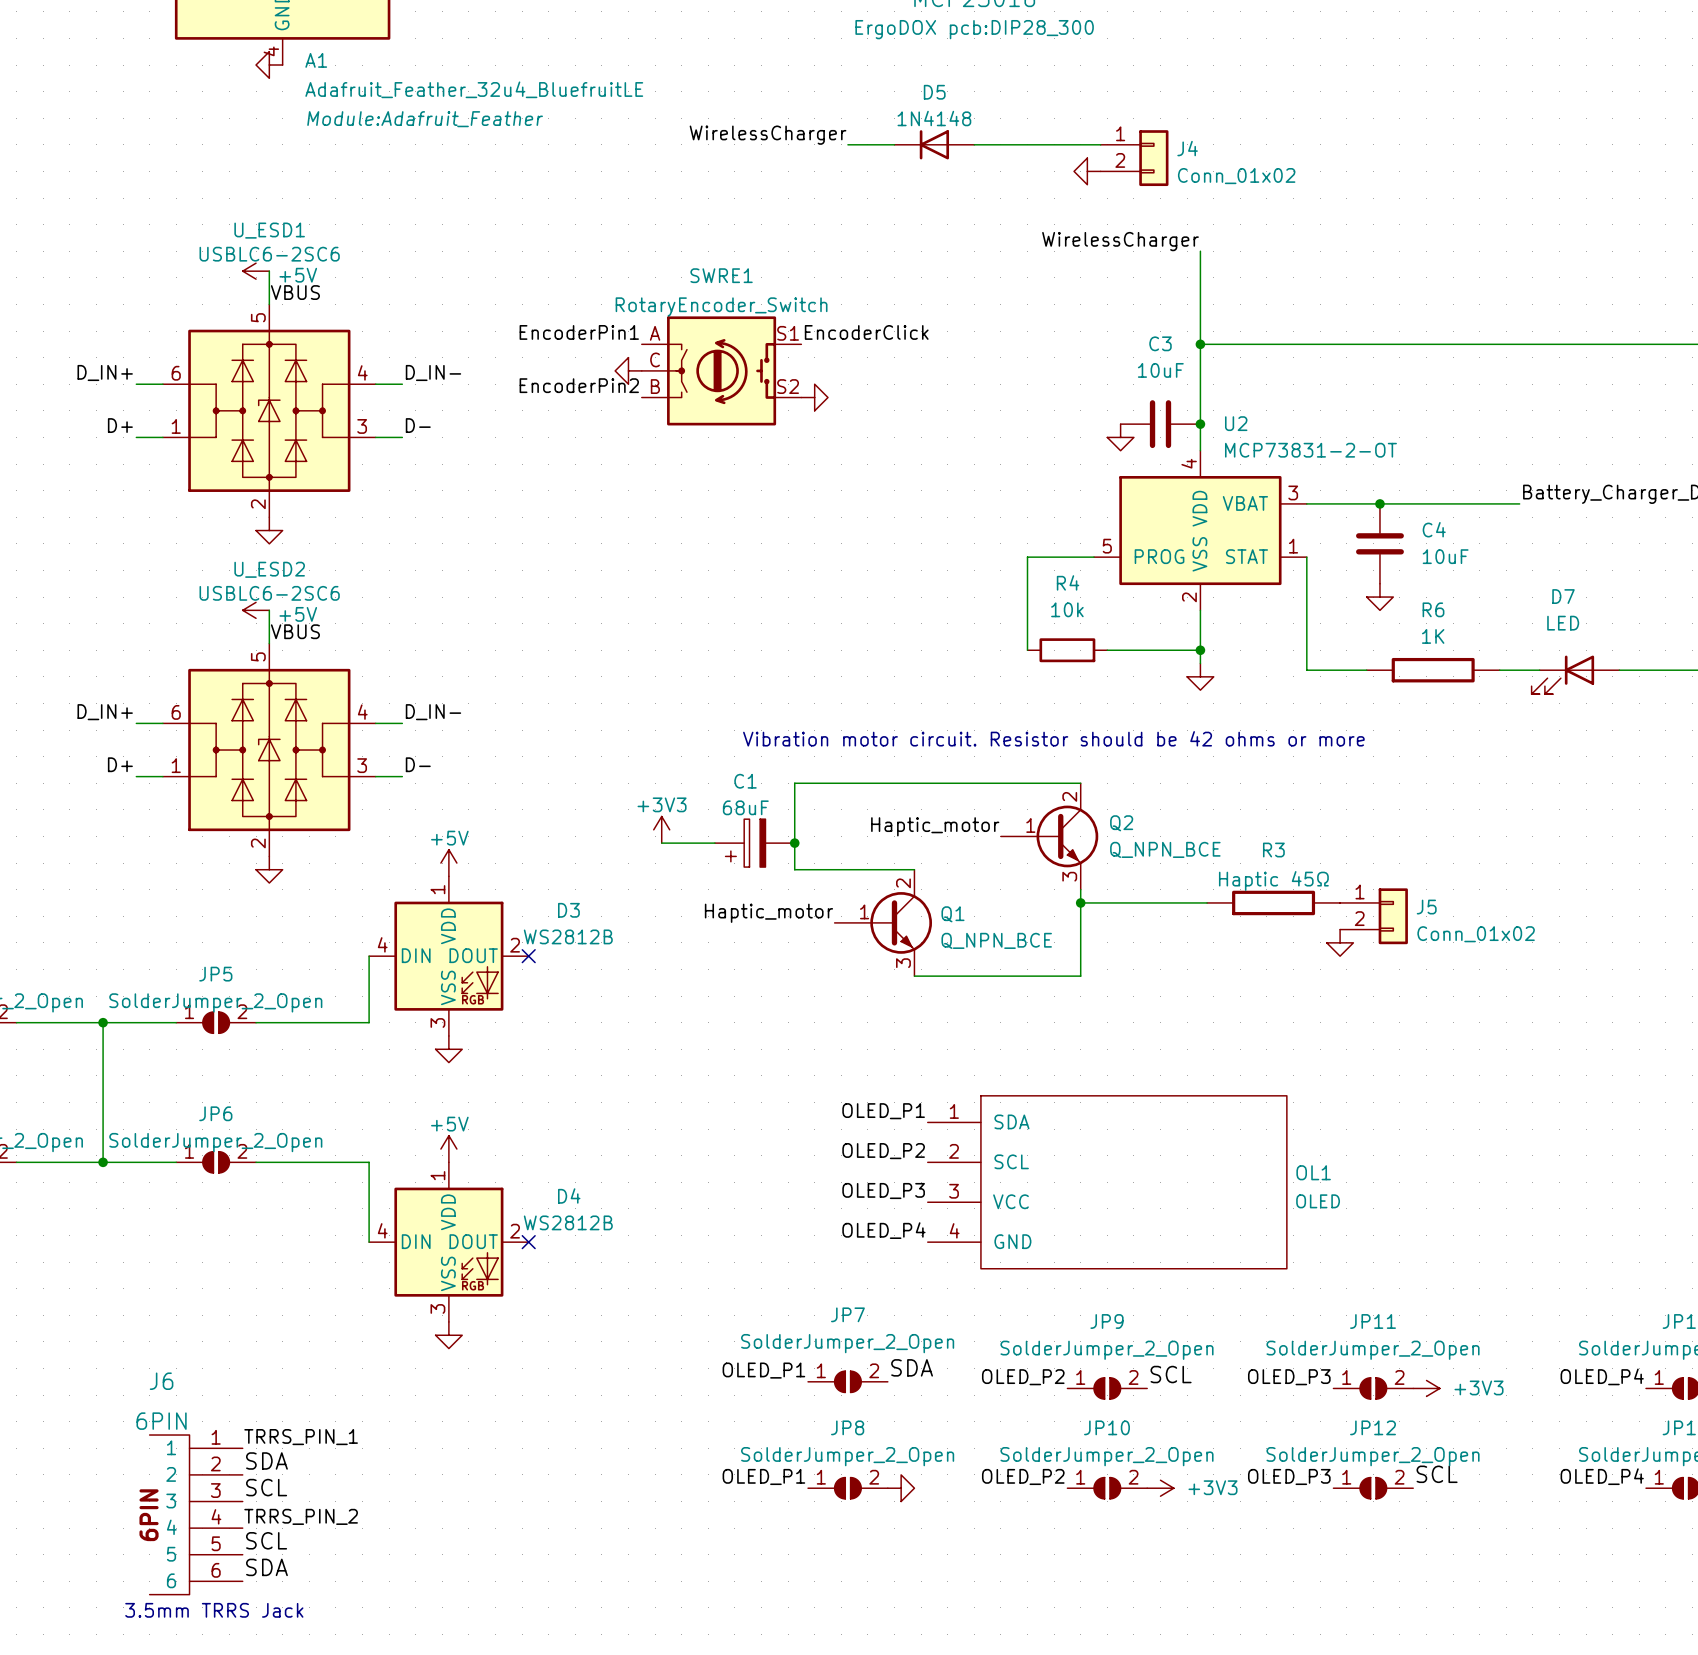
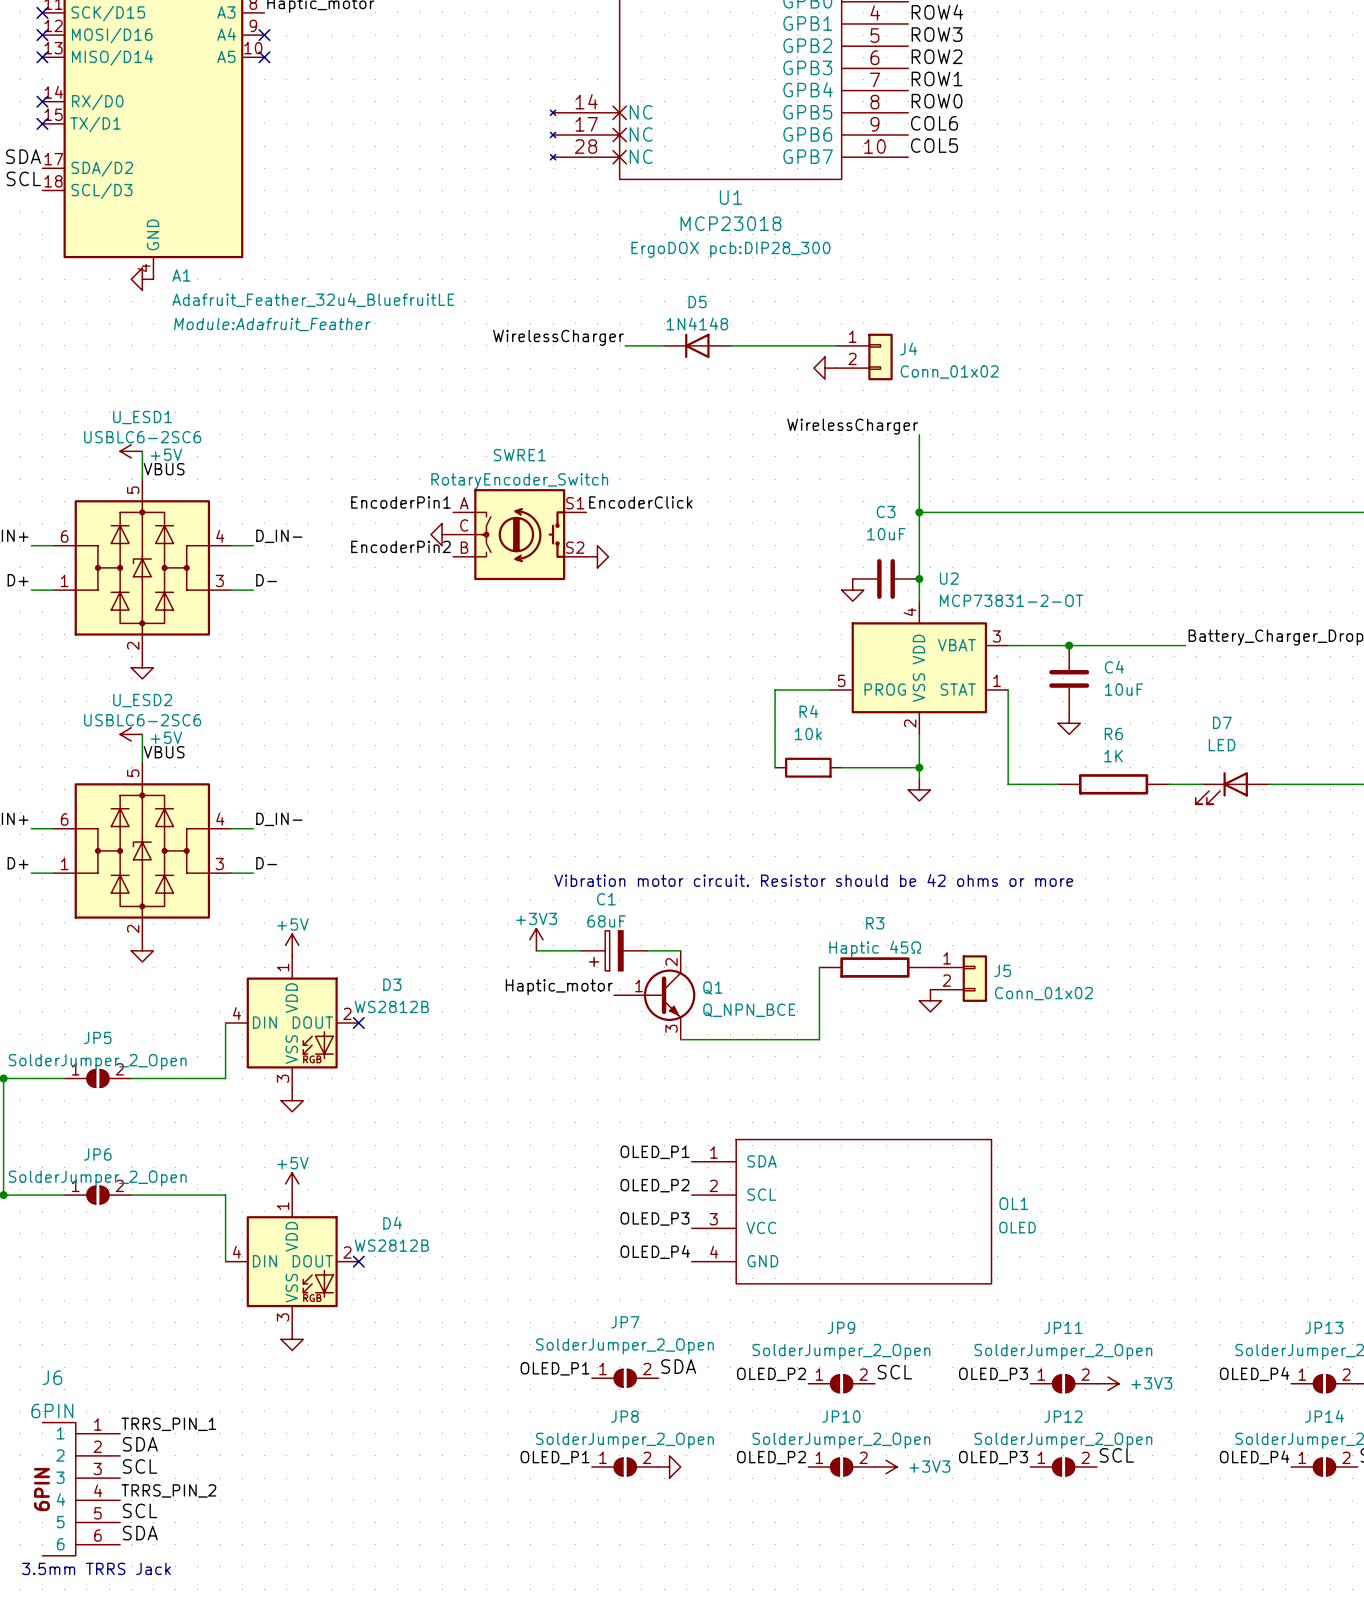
text position: Vibration motor circuit. Resistor should be 42 ohms or more (1053, 738) -> Vibration motor circuit. Resistor should be 42 ohms or more (813, 880)
wire: (1080, 783) (794, 783) (794, 869) (874, 869) -> none
label: Haptic_motor (935, 826) -> none
power symbol position: +3V3 (661, 829) -> +3V3 (536, 939)
Q2: Q_NPN_BCE (1049, 836) -> none
wire: (661, 843) (714, 843) -> (536, 950) (580, 950)
C1 position: (754, 843) -> (614, 950)
junction: (794, 843) -> none
wire: (1080, 902) (1207, 902) -> none
junction: (1080, 902) -> none
R3 position: (1273, 902) -> (874, 967)
J5 position: (1373, 916) -> (958, 978)
power symbol position: (1340, 942) -> (930, 1000)

